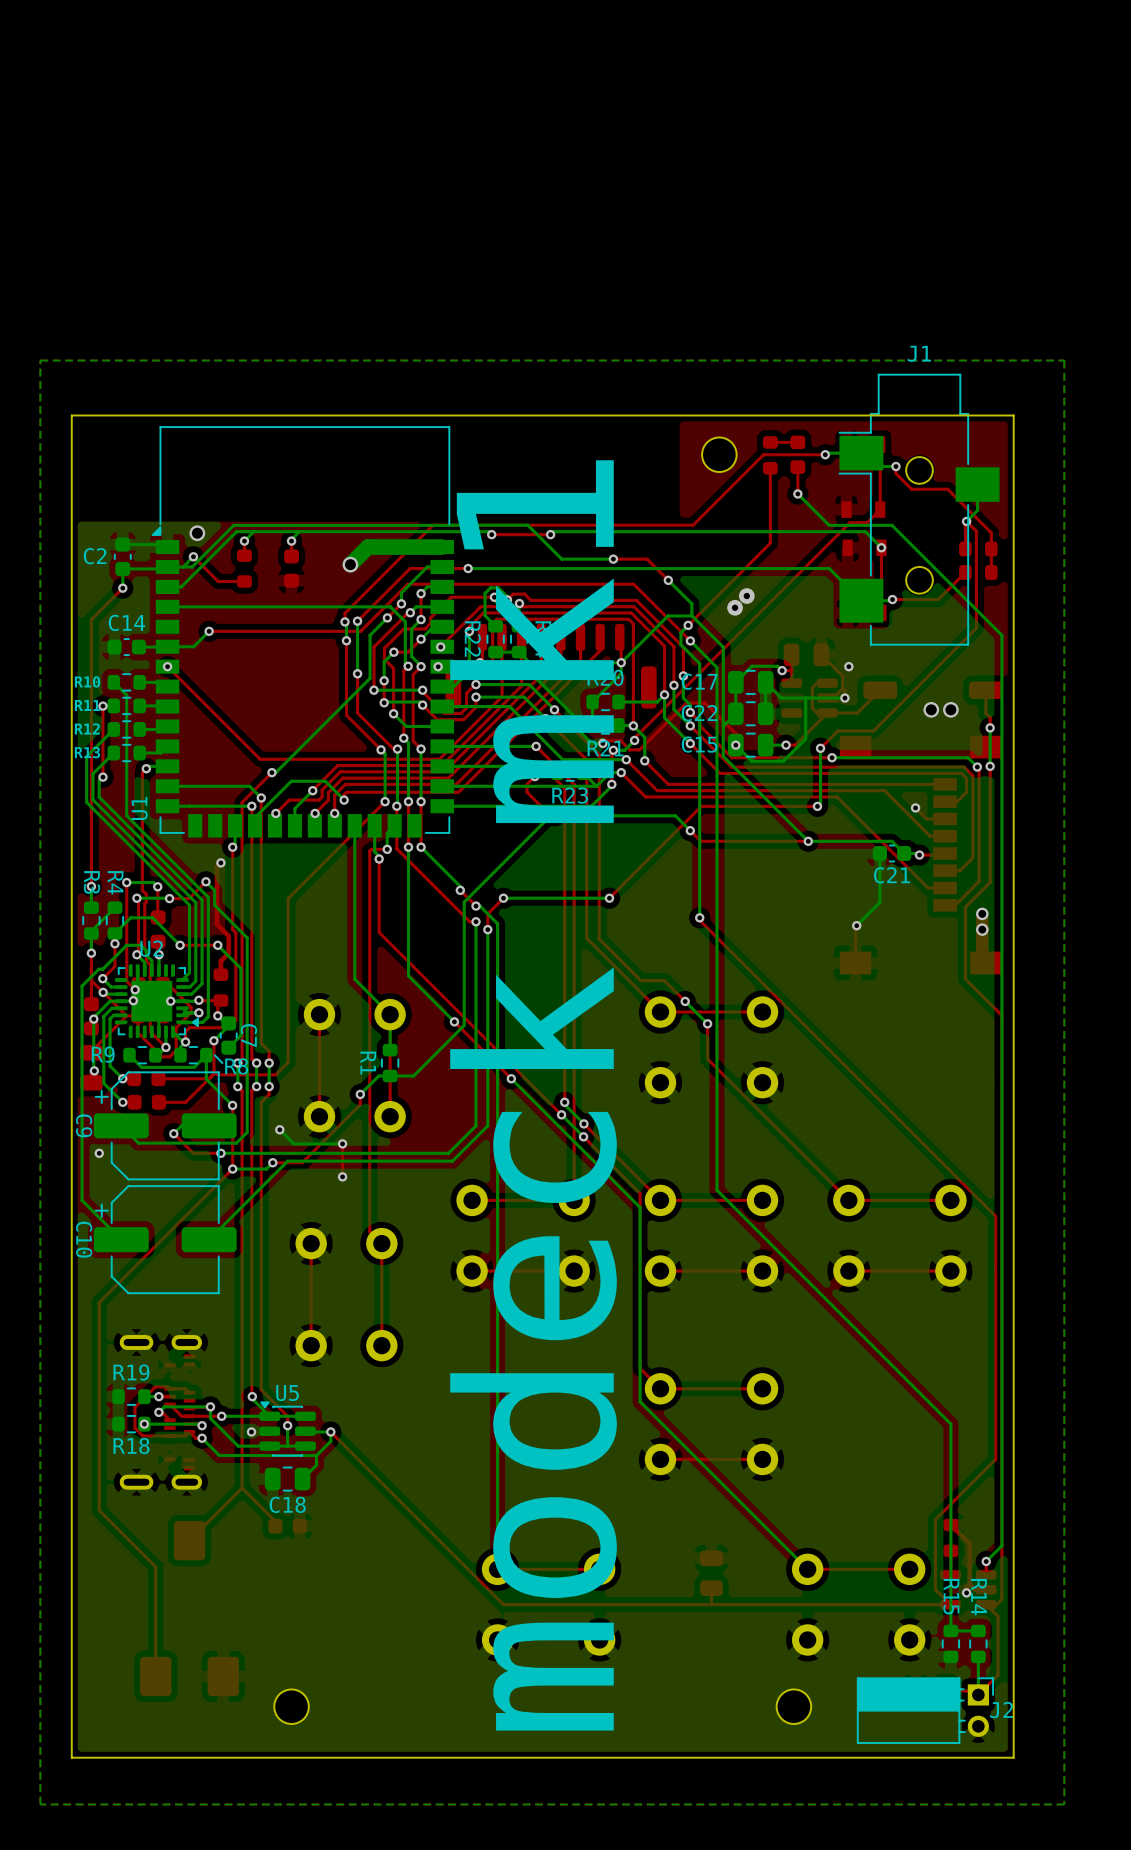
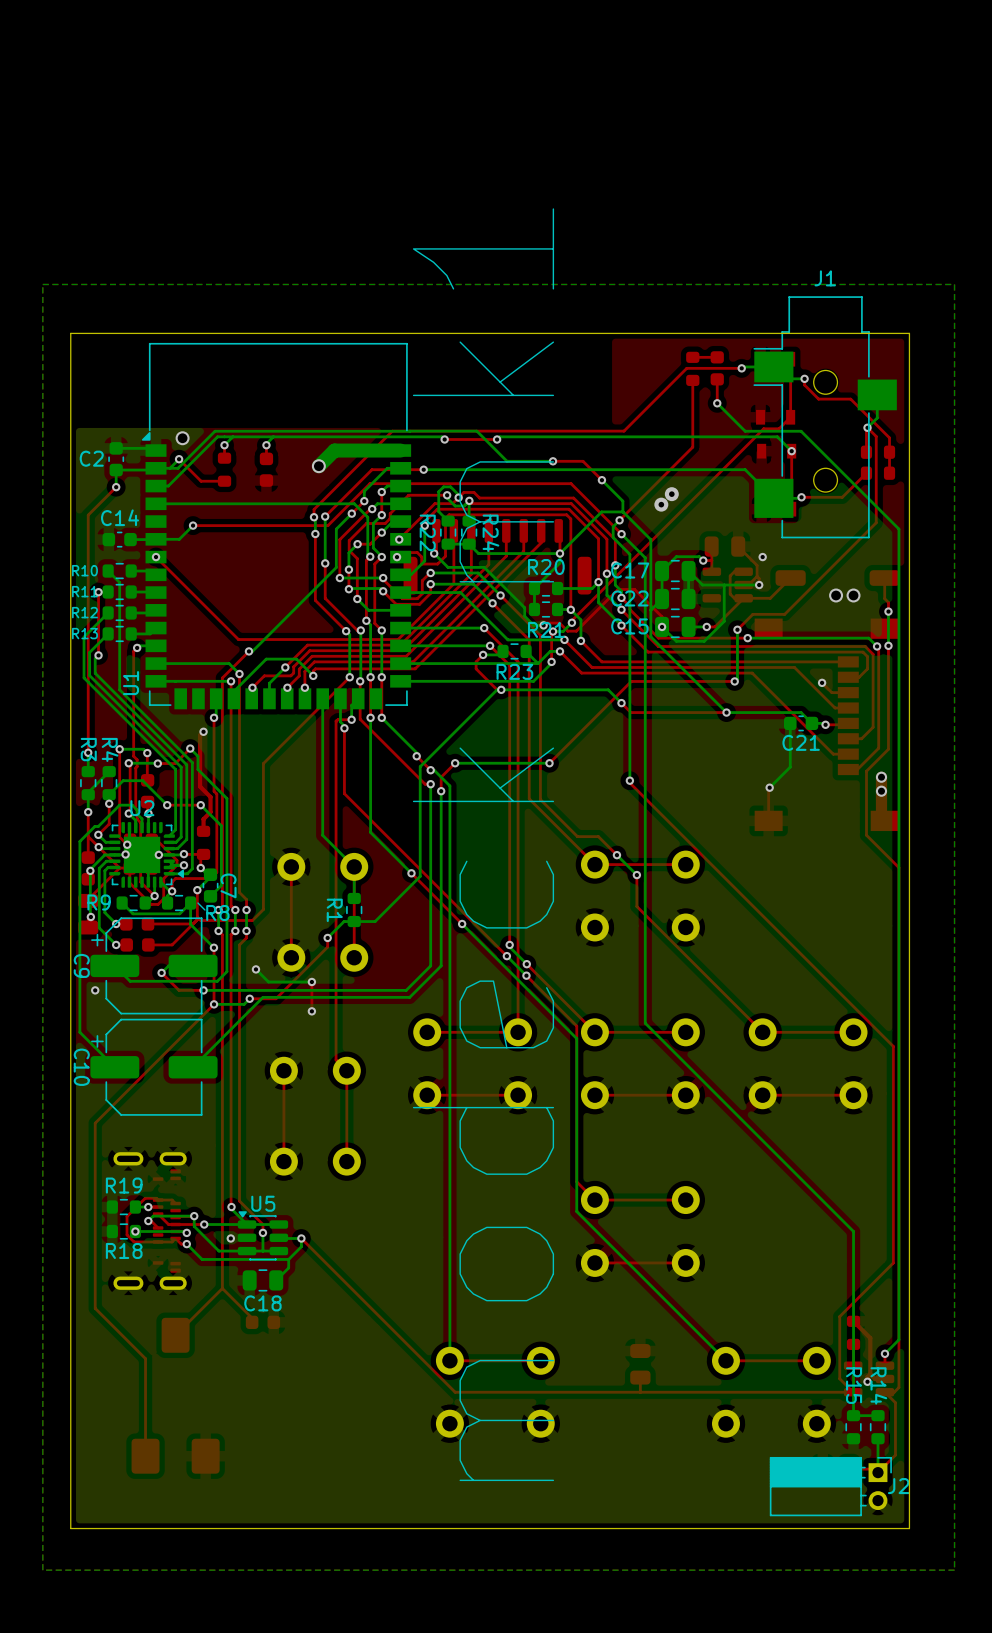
part: (719, 454) -> none
part: (291, 1706) -> none
part: (793, 1706) -> none

